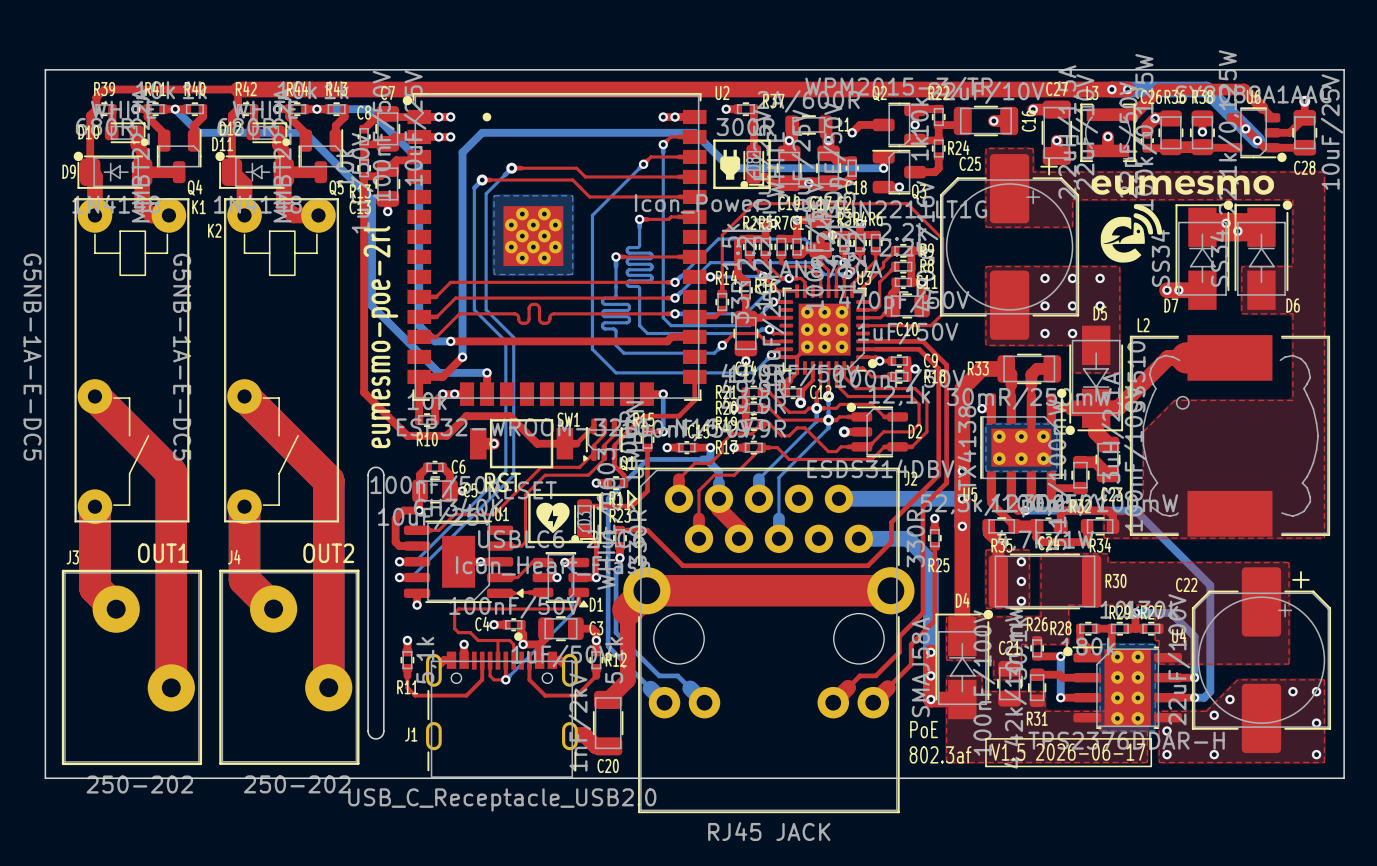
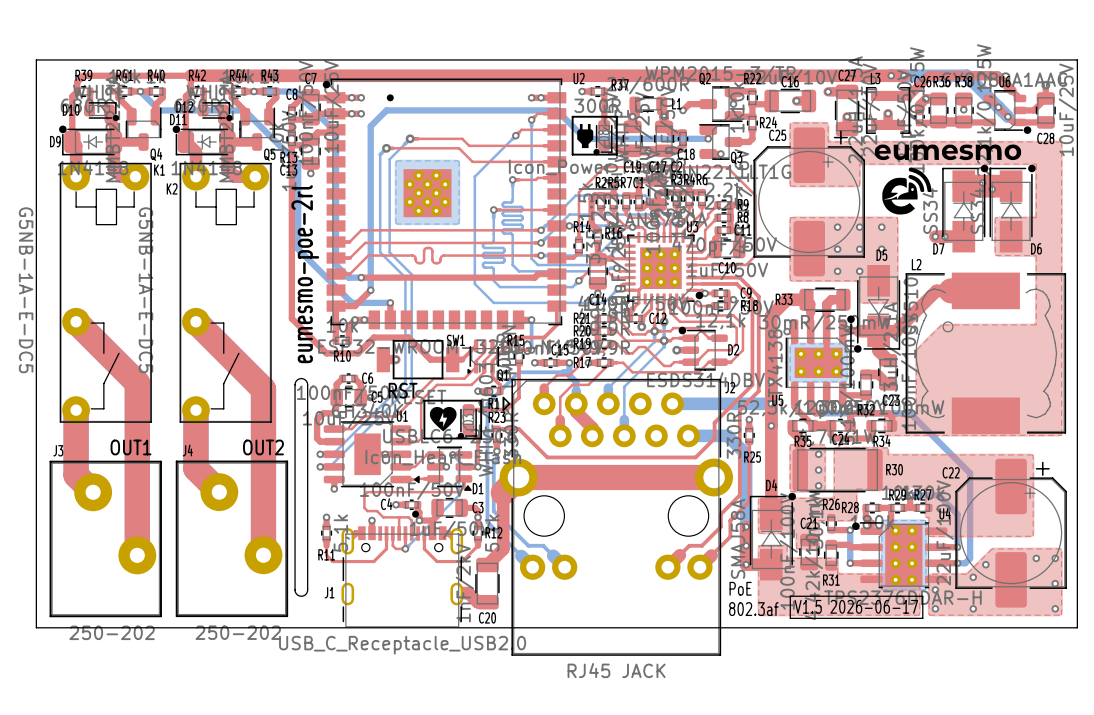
C16 name rotation: 0° (1028, 120) -> 90° clockwise (790, 81)
C16 name position: C16 (1028, 120) -> C16 (790, 81)

